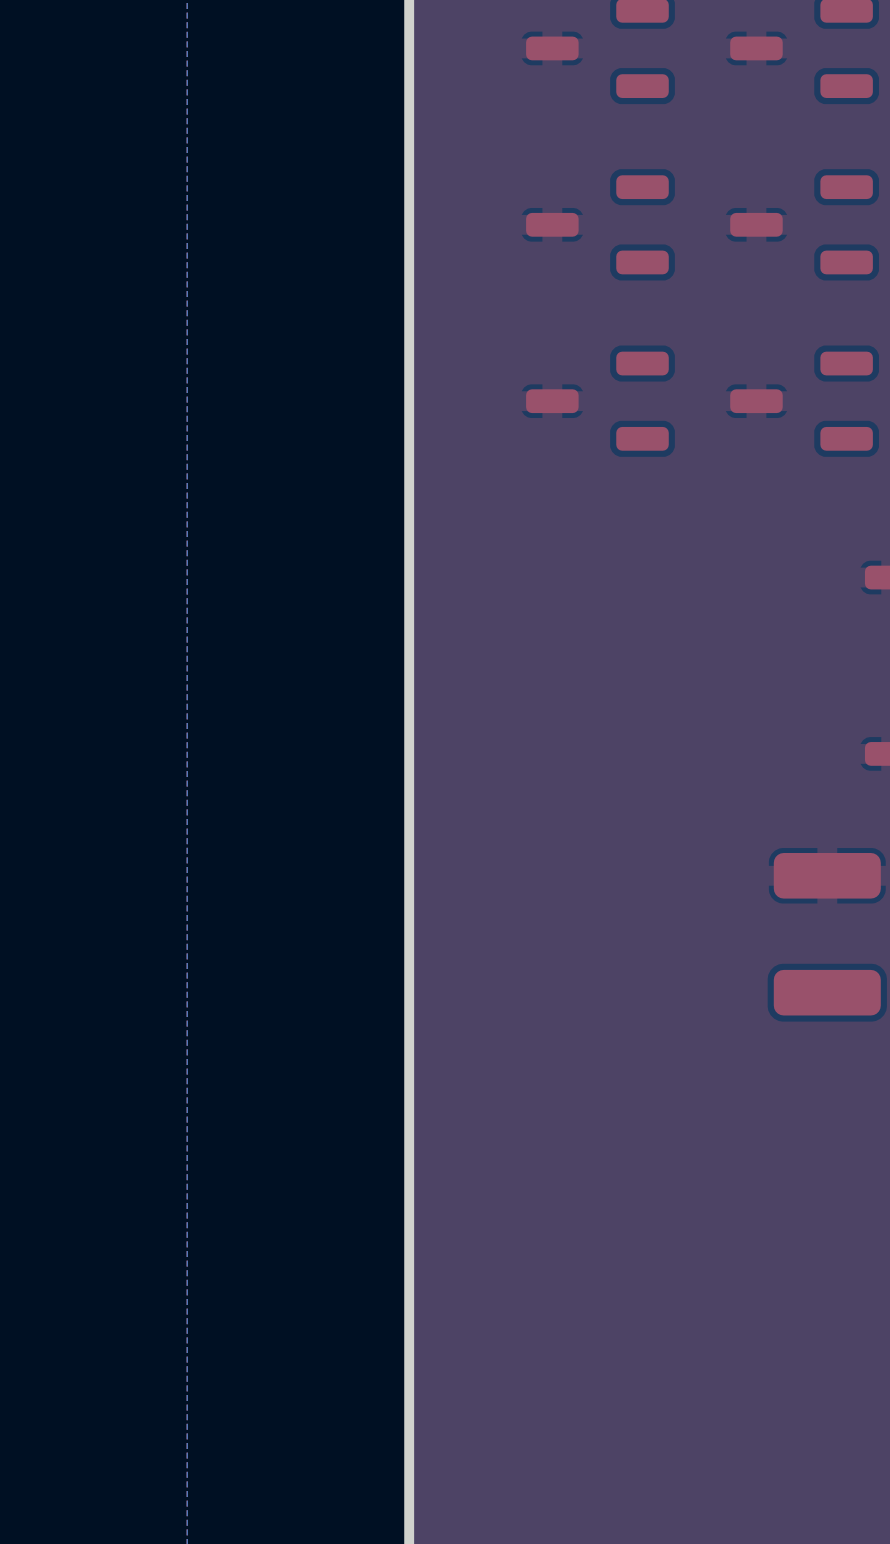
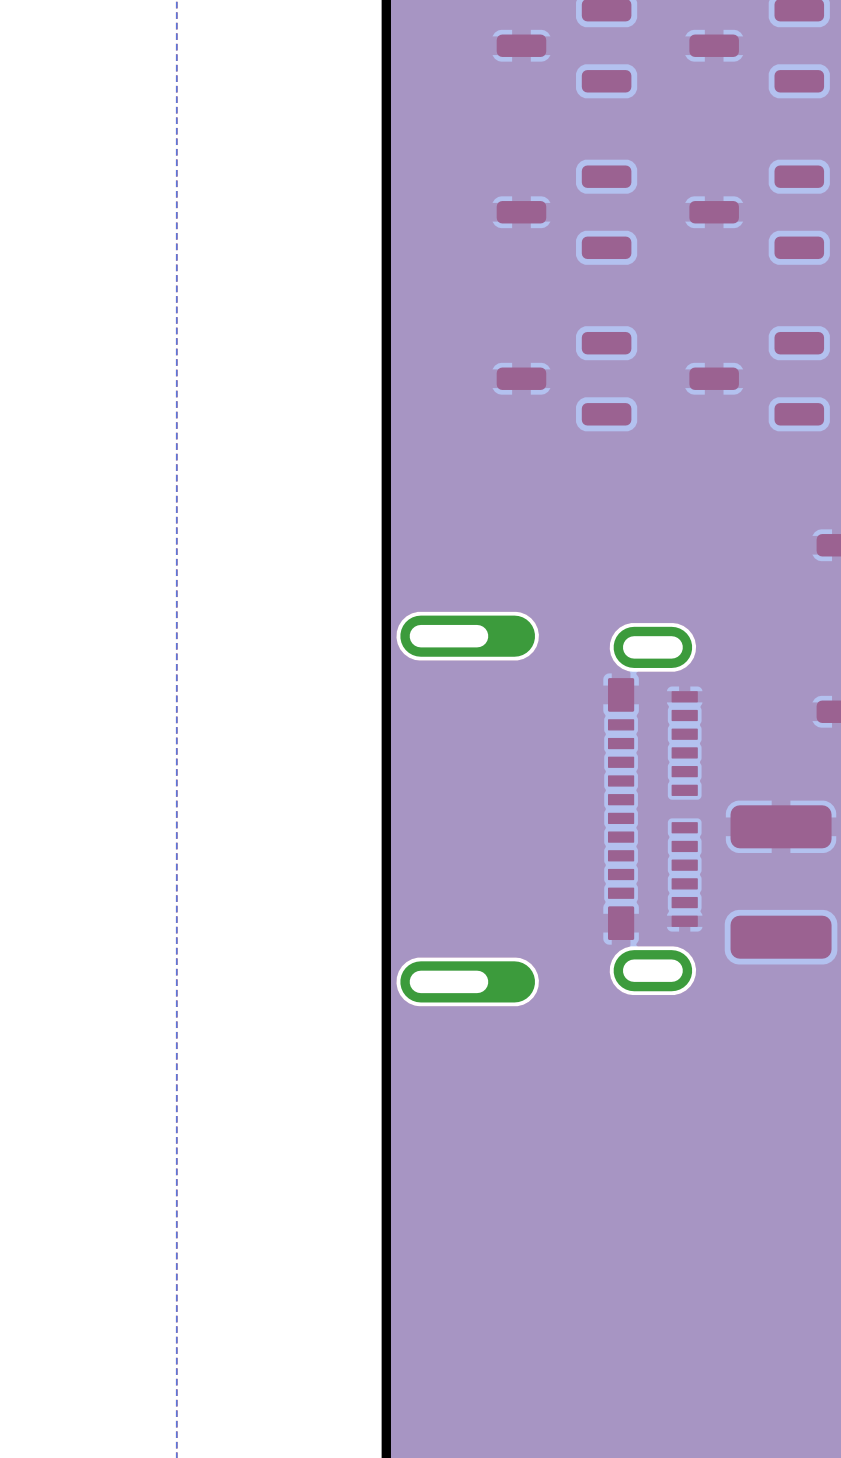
part: none -> (549, 809)

